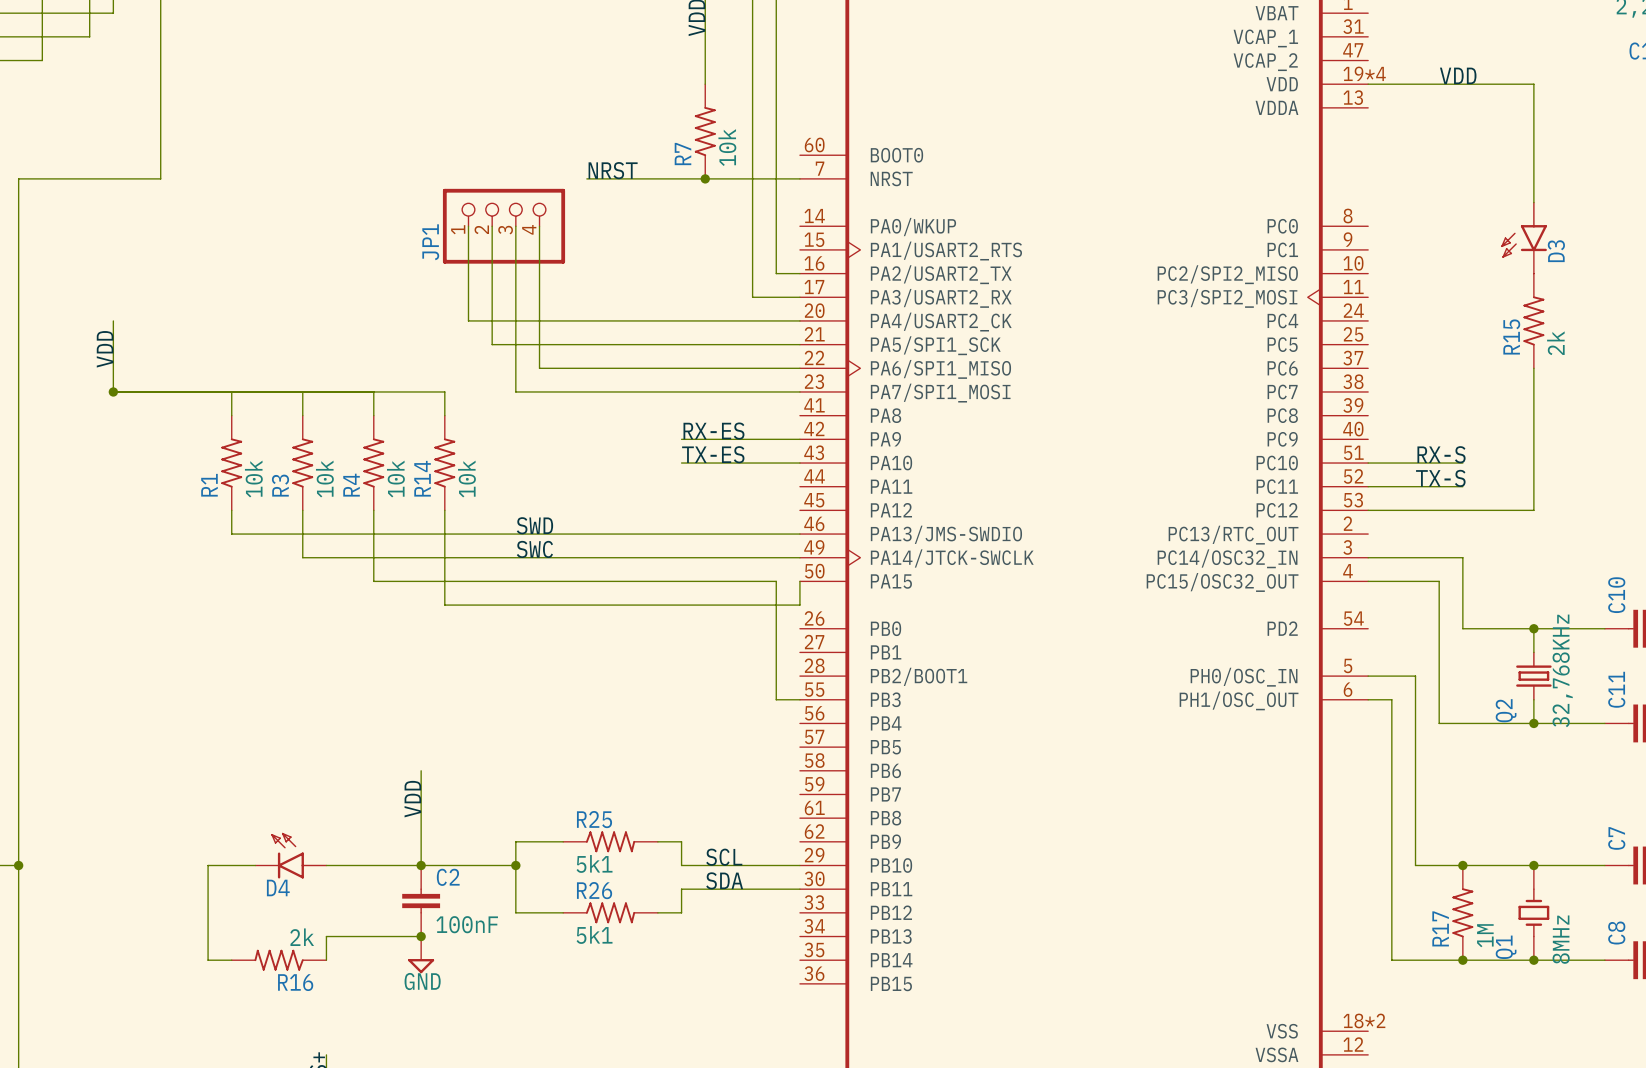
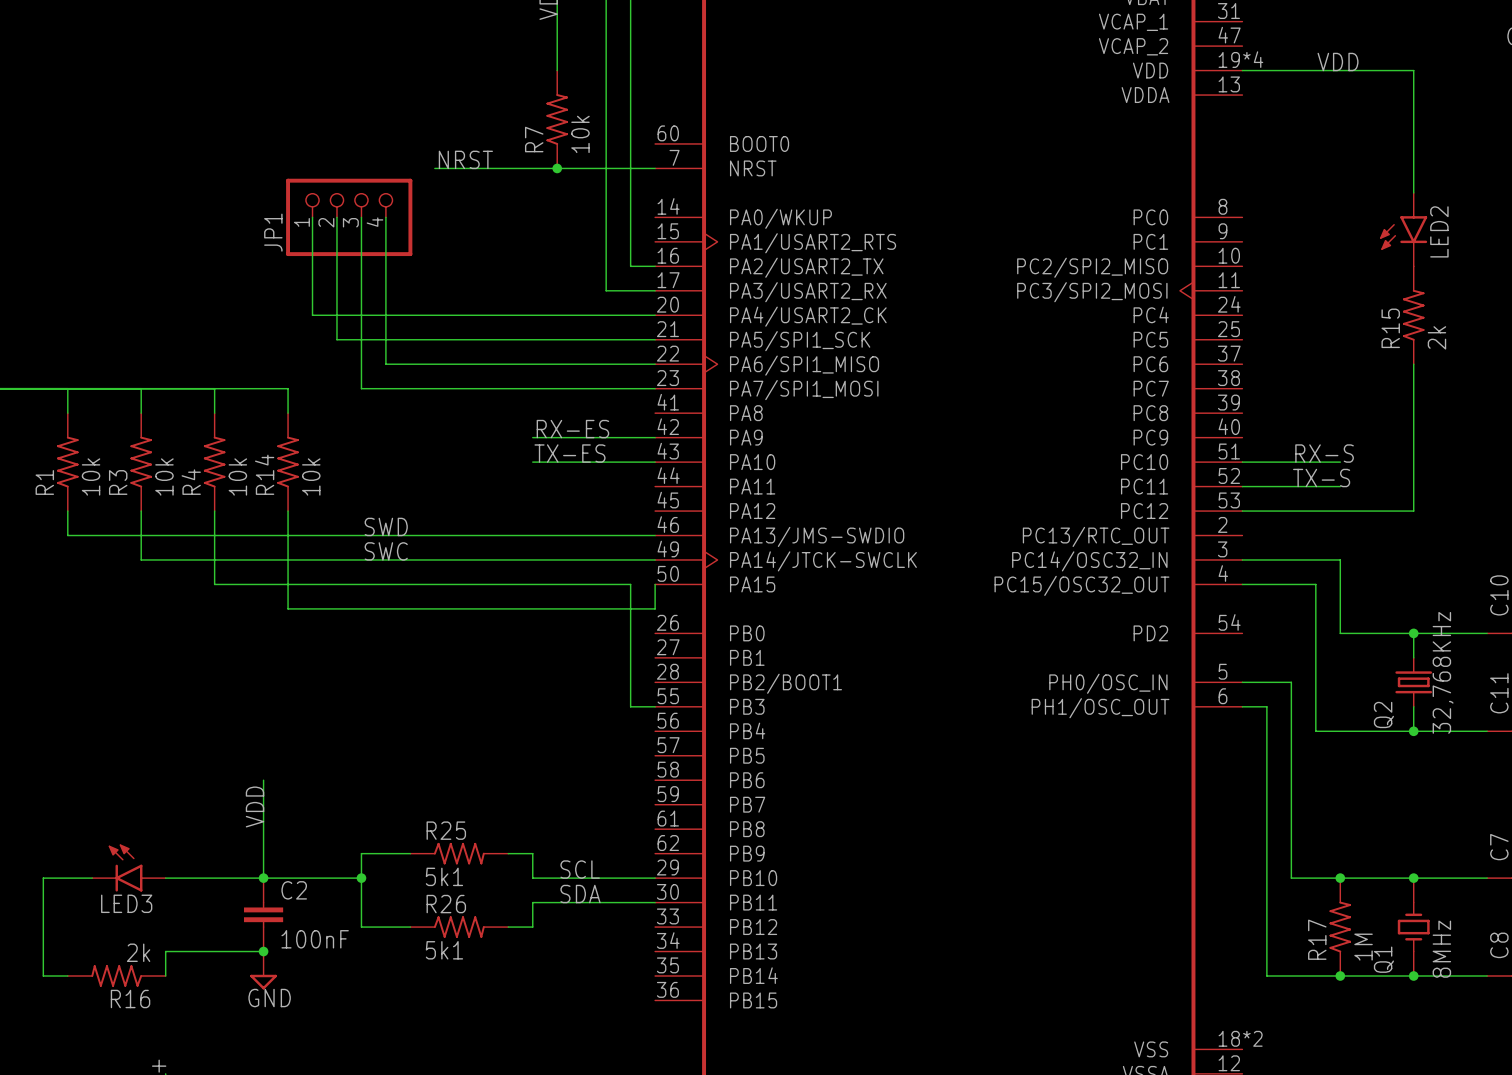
D3: (1524, 237) -> none
LED2: none -> (1403, 229)
LED3: none -> (128, 867)
D4: (291, 855) -> none

